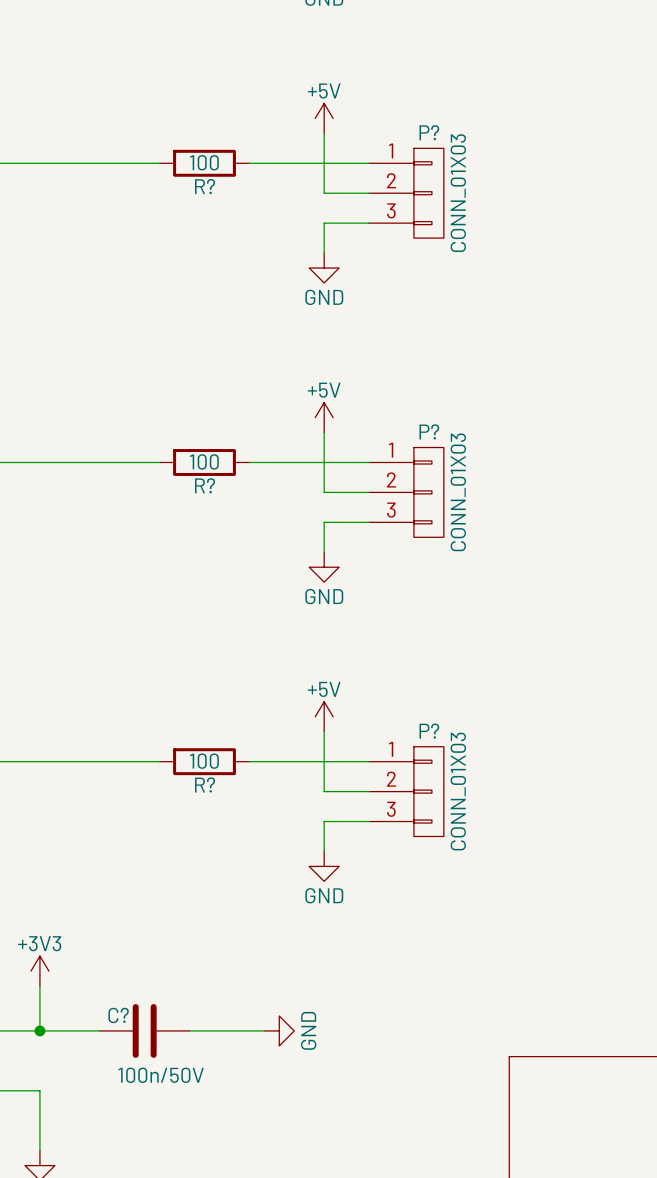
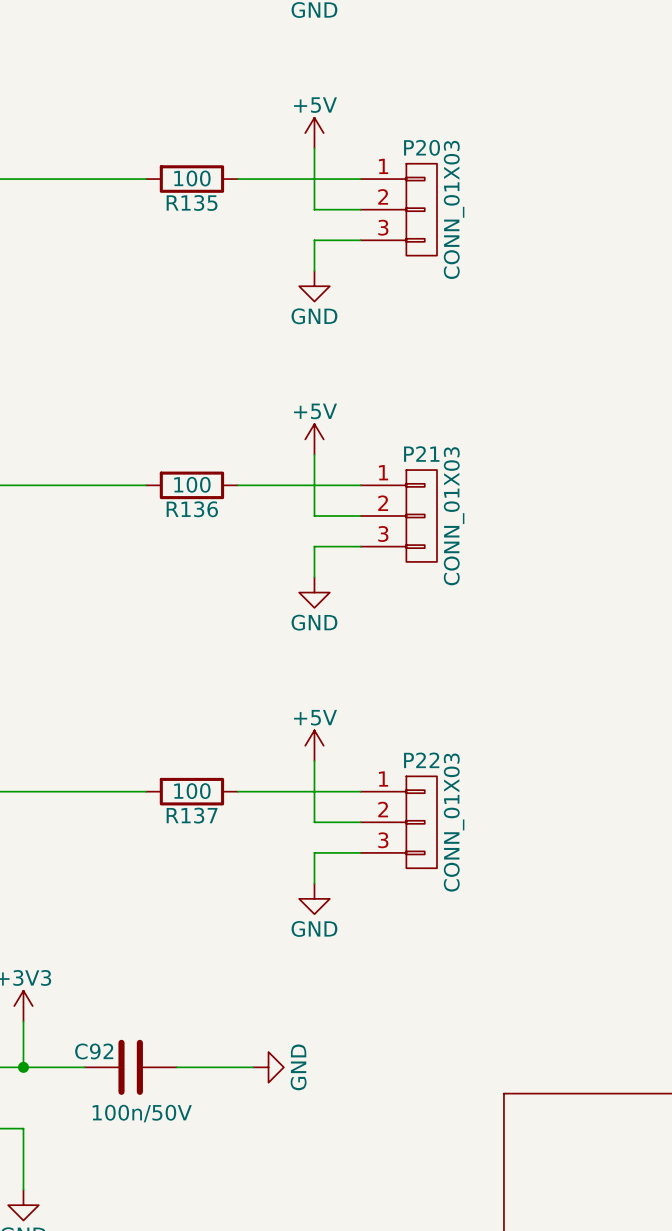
P? name: P? (429, 132) -> P20 (422, 147)
R? name: R? (205, 186) -> R135 (192, 202)
P? name: P? (429, 431) -> P21 (421, 454)
R? name: R? (205, 485) -> R136 (192, 509)
P? name: P? (429, 731) -> P22 (421, 760)
R? name: R? (205, 784) -> R137 (192, 815)
C? name: C? (118, 1015) -> C92 (94, 1051)

